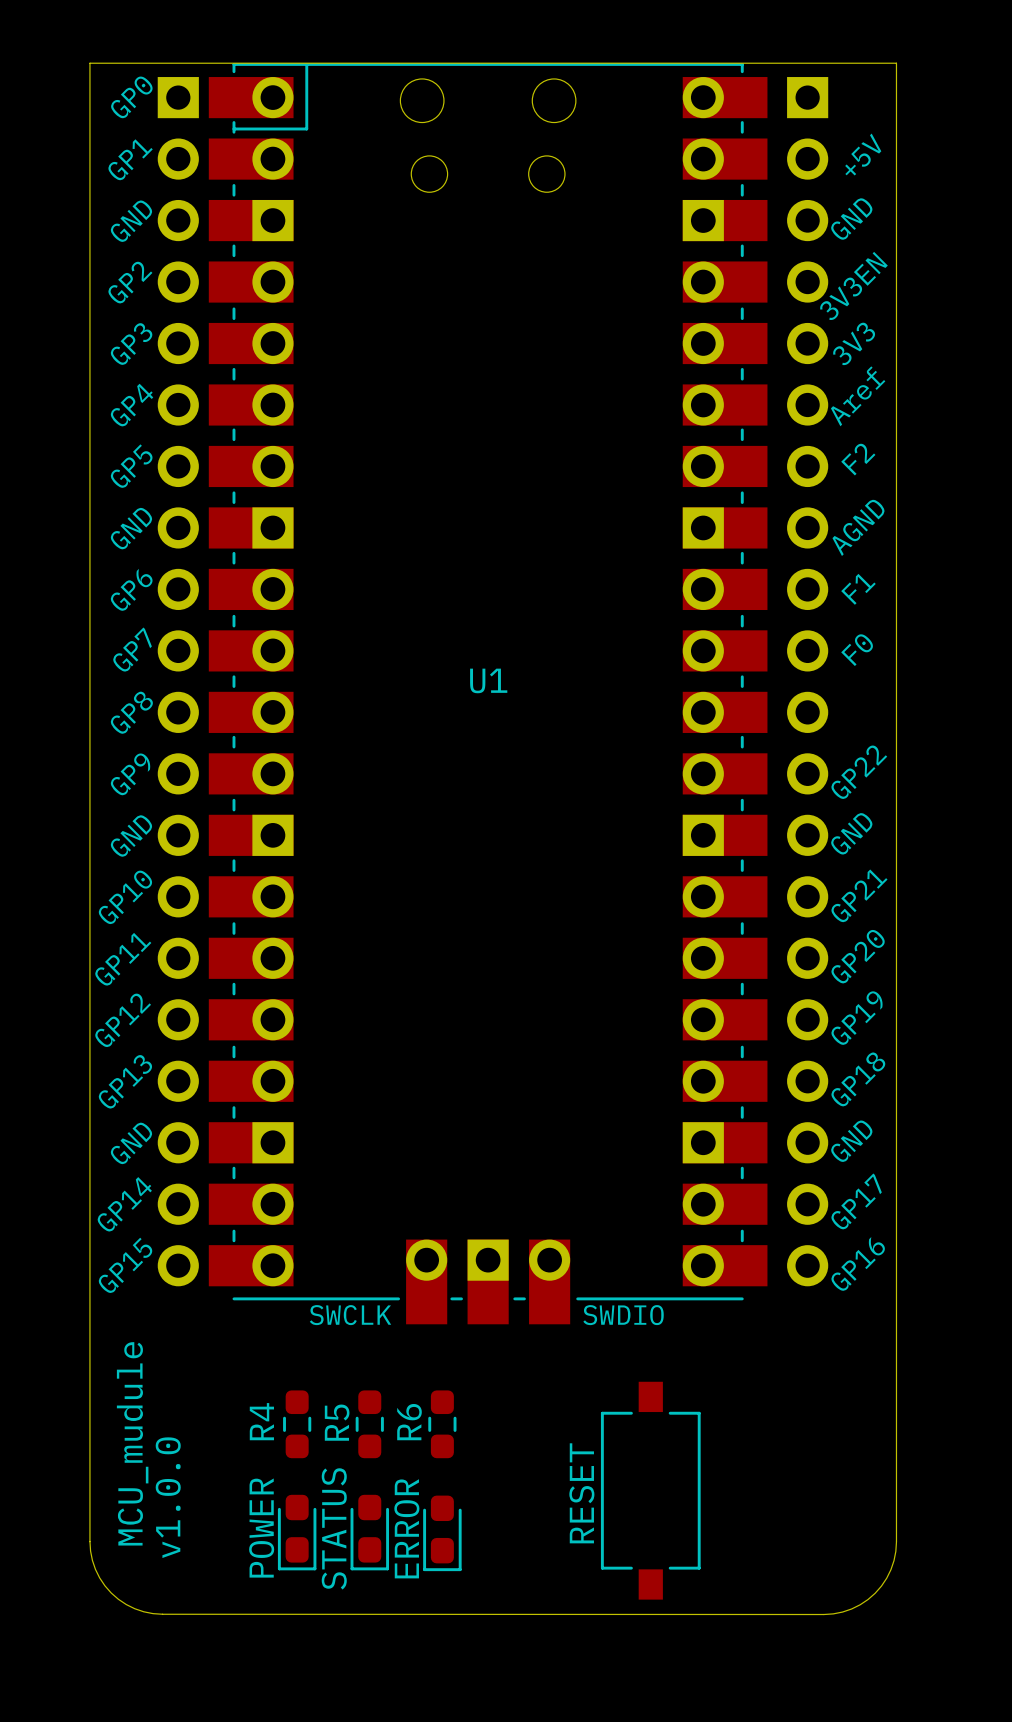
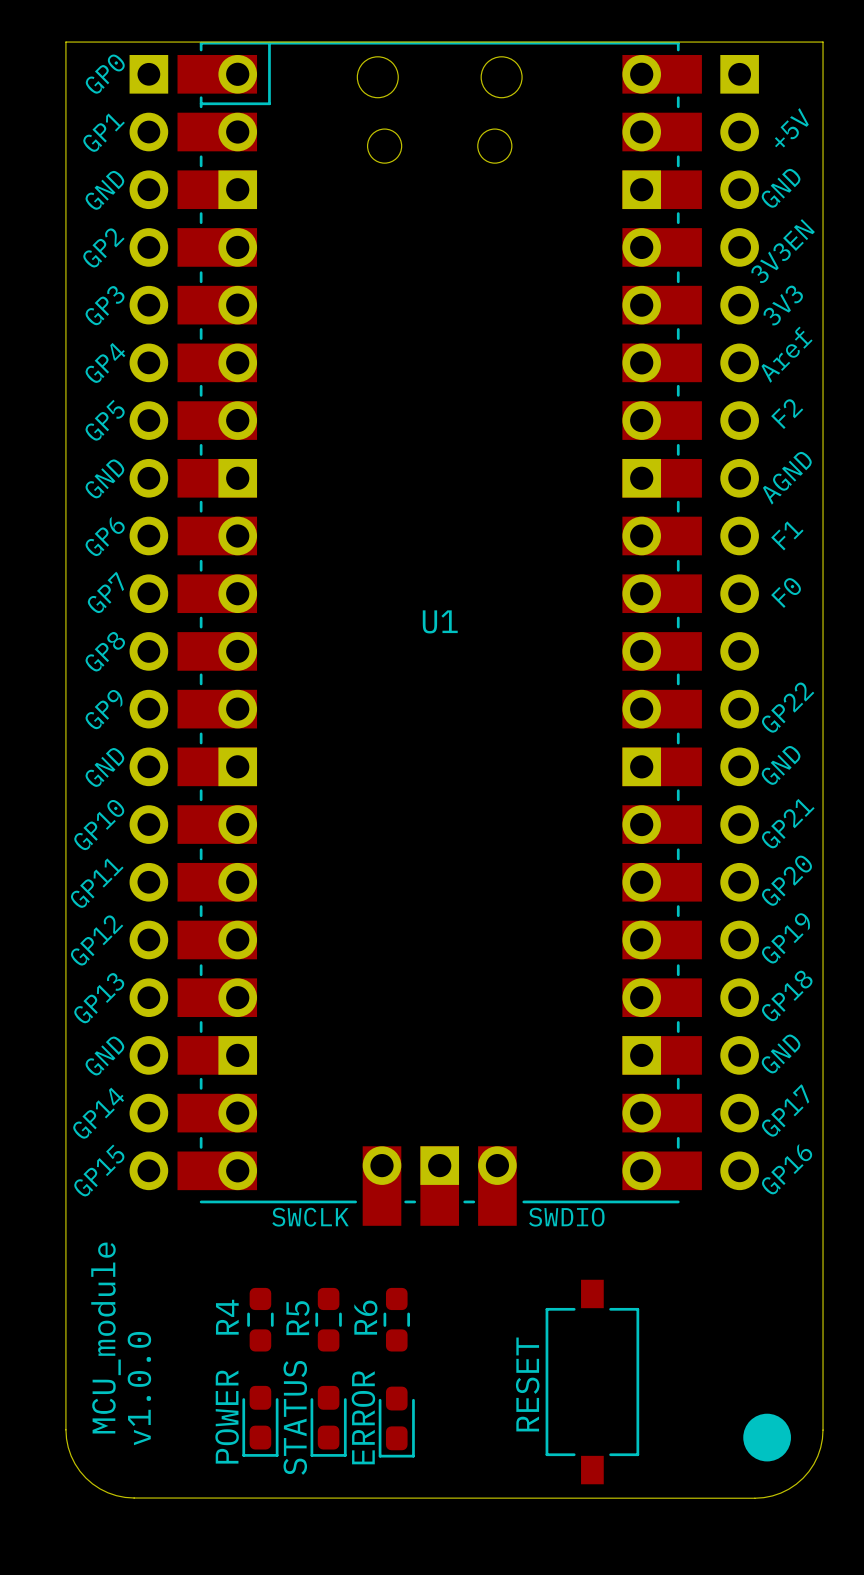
text: MCU_mudule (132, 1443) -> MCU_module (106, 1338)
drawing: none -> [743, 1413, 791, 1462]

